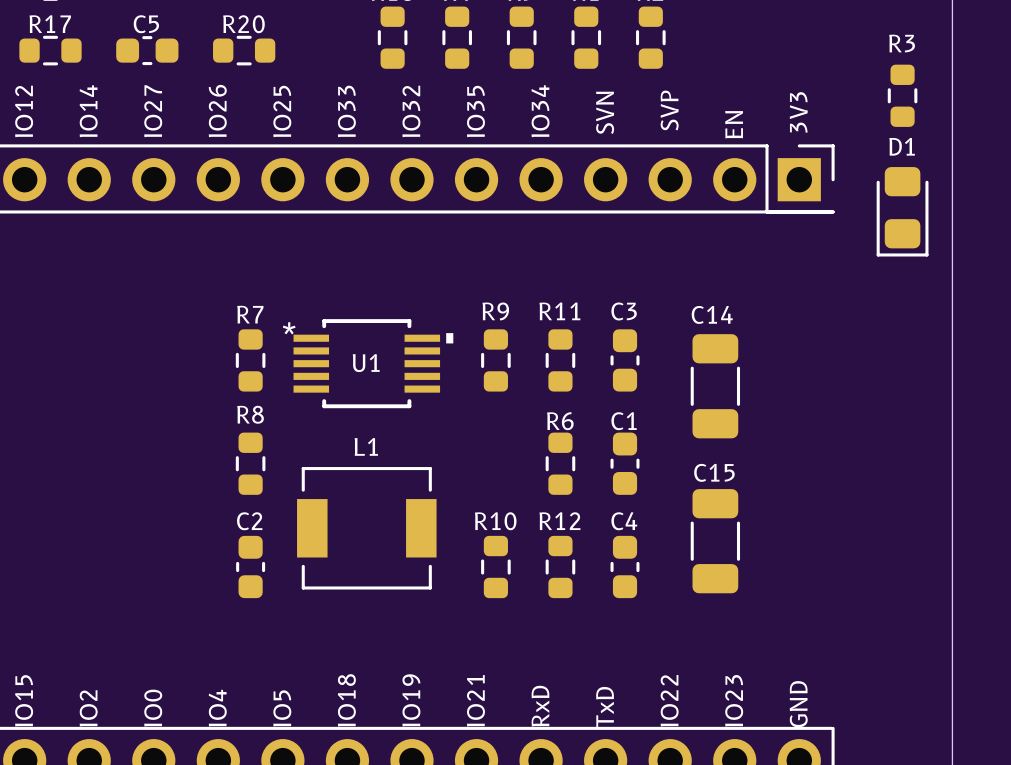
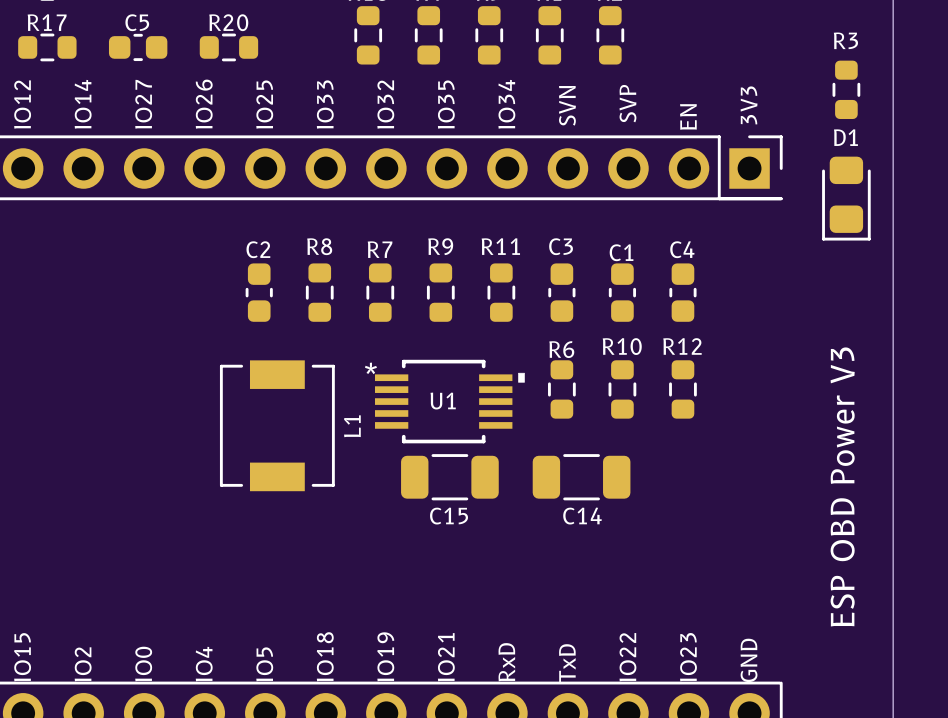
C14 name position: C14 (712, 314) -> C14 (582, 516)
R7 position: (250, 360) -> (380, 292)
R9 position: (495, 360) -> (440, 292)
R11 position: (560, 360) -> (501, 292)
C3 position: (625, 360) -> (561, 292)
U1 position: (373, 363) -> (449, 401)
C14 rotation: 0° (715, 386) -> 90° clockwise (581, 477)
C14 position: (715, 386) -> (581, 477)
R8 position: (250, 463) -> (319, 292)
R6 position: (560, 463) -> (561, 389)
C1 position: (625, 463) -> (622, 292)
C15 name position: C15 (714, 472) -> C15 (449, 516)
text: none -> ESP OBD Power V3 (842, 486)
L1 rotation: 0° (366, 528) -> 90° clockwise (277, 425)
L1 position: (366, 528) -> (277, 425)
C15 rotation: 0° (715, 541) -> 90° clockwise (449, 477)
C15 position: (715, 541) -> (449, 477)
C2 position: (250, 567) -> (259, 292)
R10 position: (495, 567) -> (622, 389)
R12 position: (560, 567) -> (682, 389)
C4 position: (625, 567) -> (682, 292)

